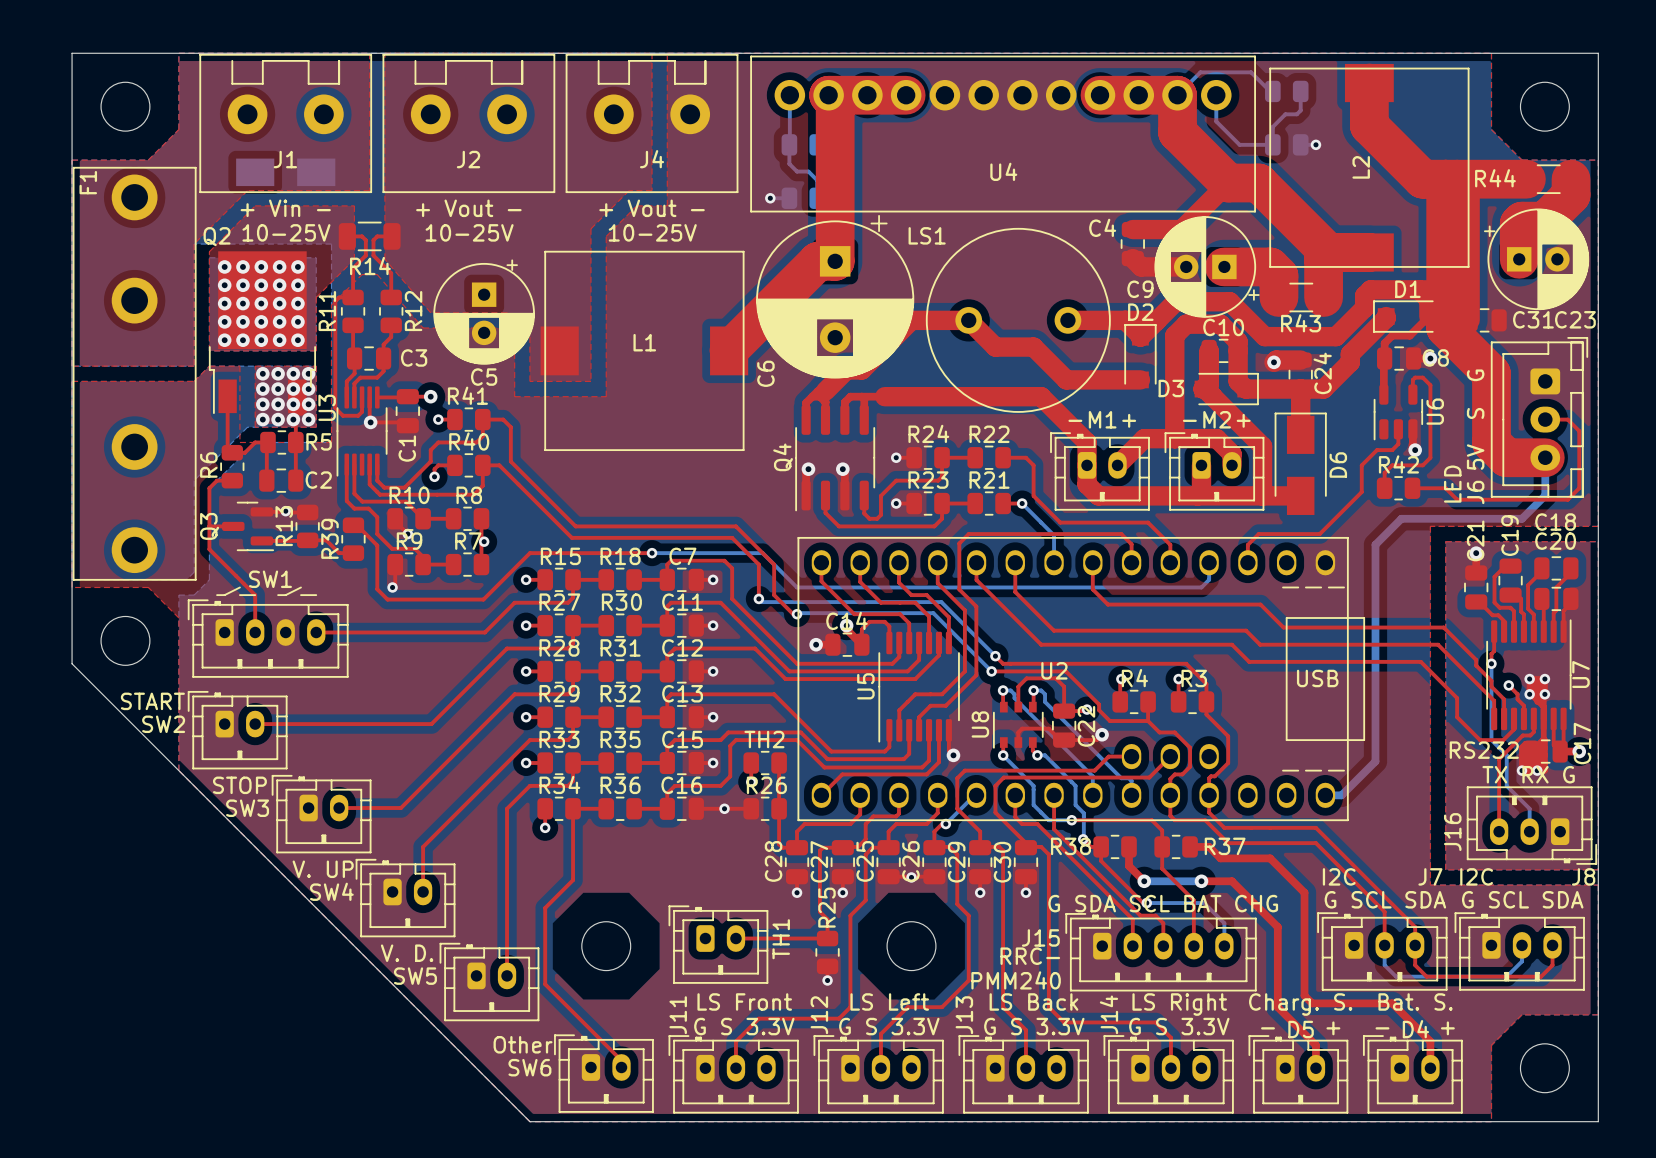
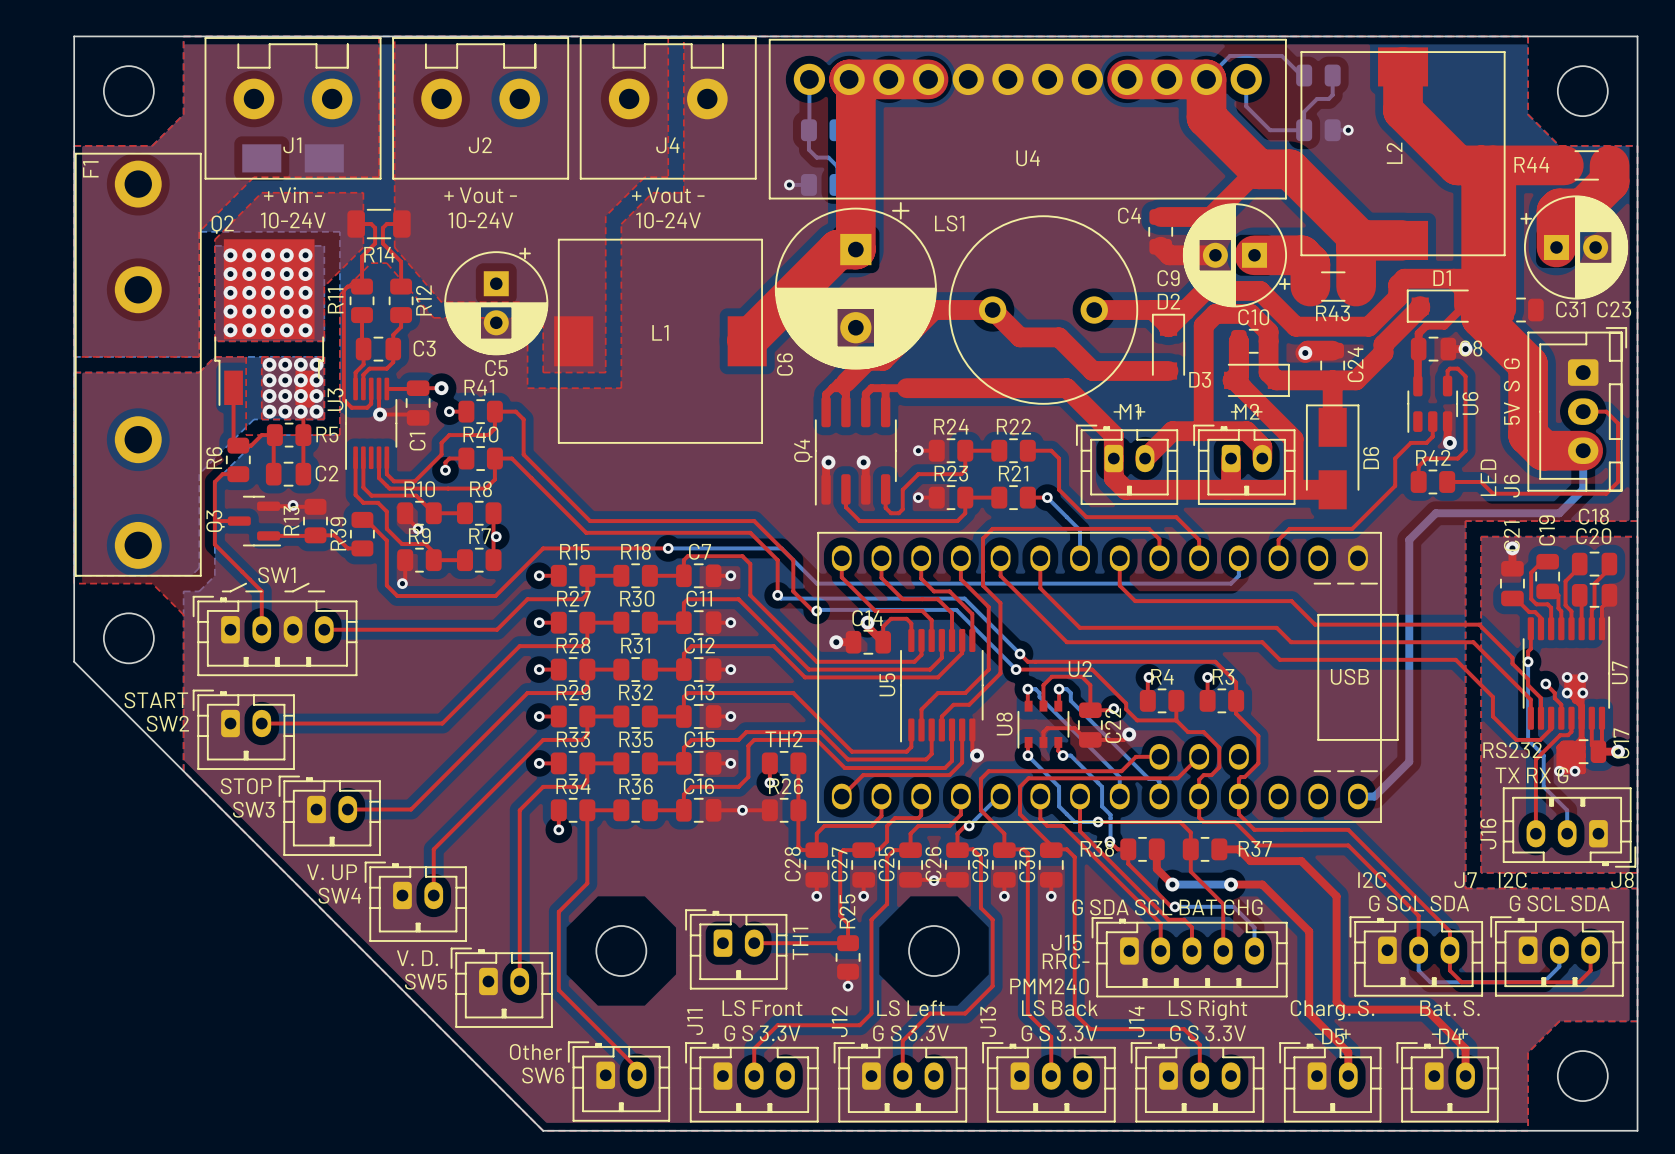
text: 10-25V (286, 232) -> 10-24V (293, 220)
text: 10-25V (469, 232) -> 10-24V (480, 220)
text: 10-25V (652, 232) -> 10-24V (668, 220)

